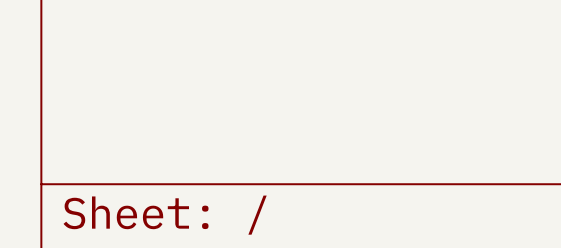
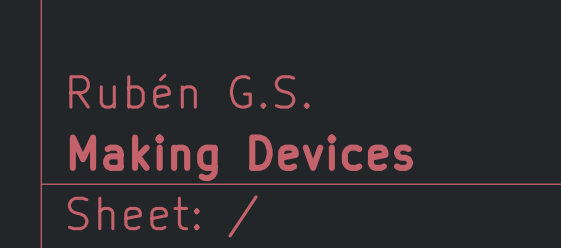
title block: none -> Rubén G.S. (189, 91)
title block: none -> Making Devices (241, 157)

